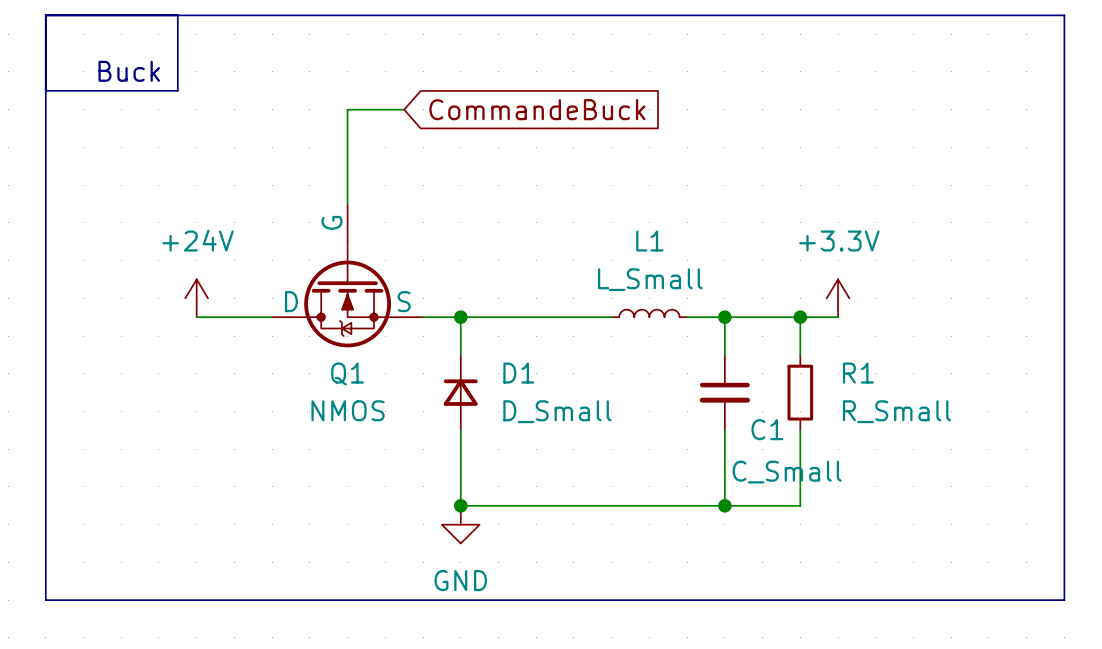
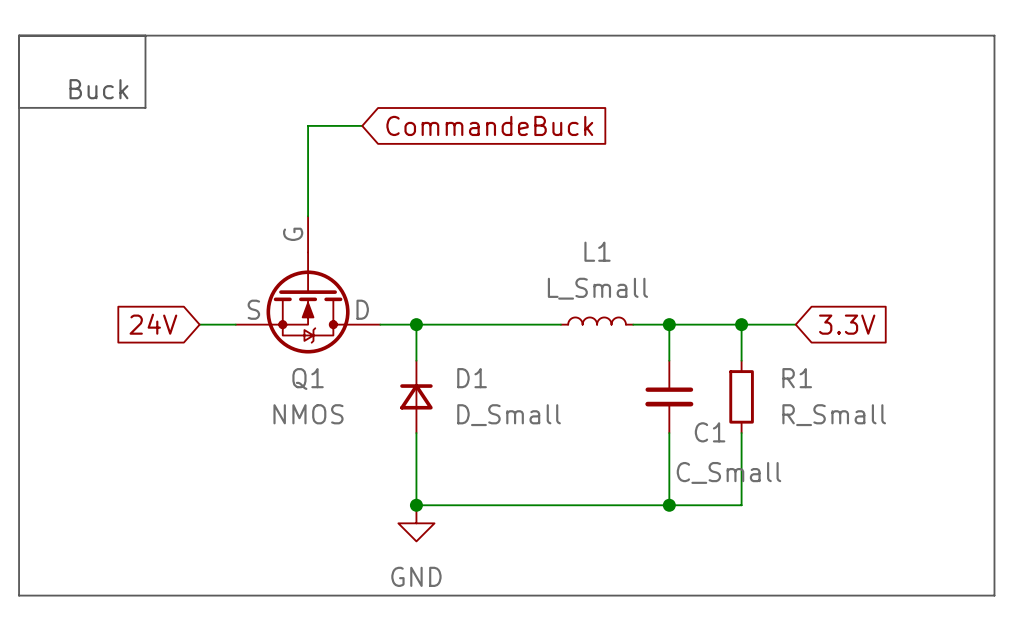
Q1 flip: as is (347, 294) -> left-right (308, 302)
power symbol: +24V (196, 298) -> none
power symbol: +3.3V (838, 298) -> none
global label: none -> 24V (153, 324)
wire: (196, 317) (234, 317) -> none
wire: none -> (777, 324) (795, 324)
global label: none -> 3.3V (847, 324)

